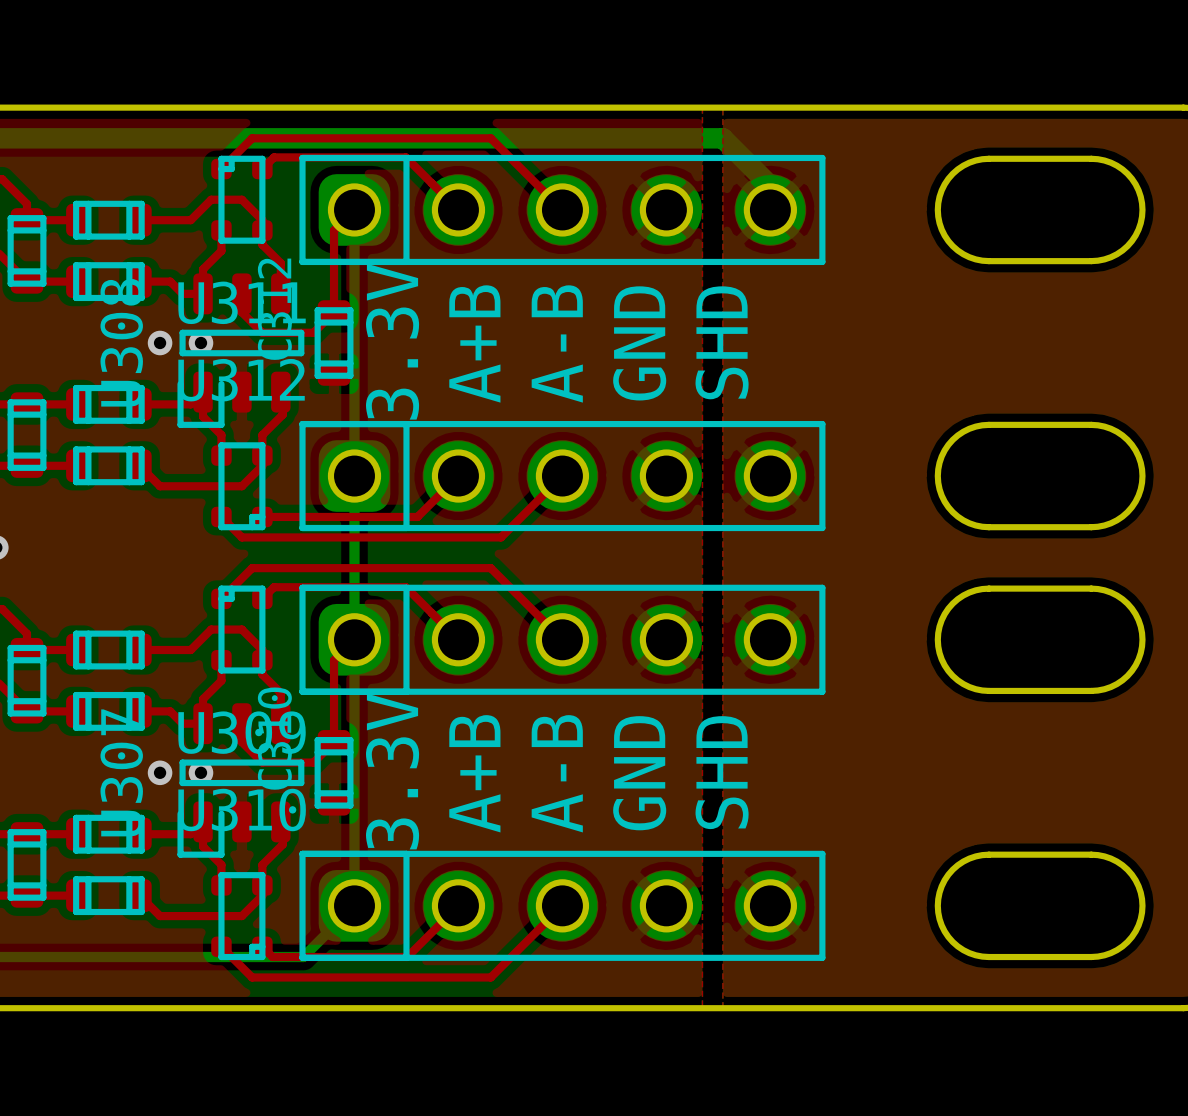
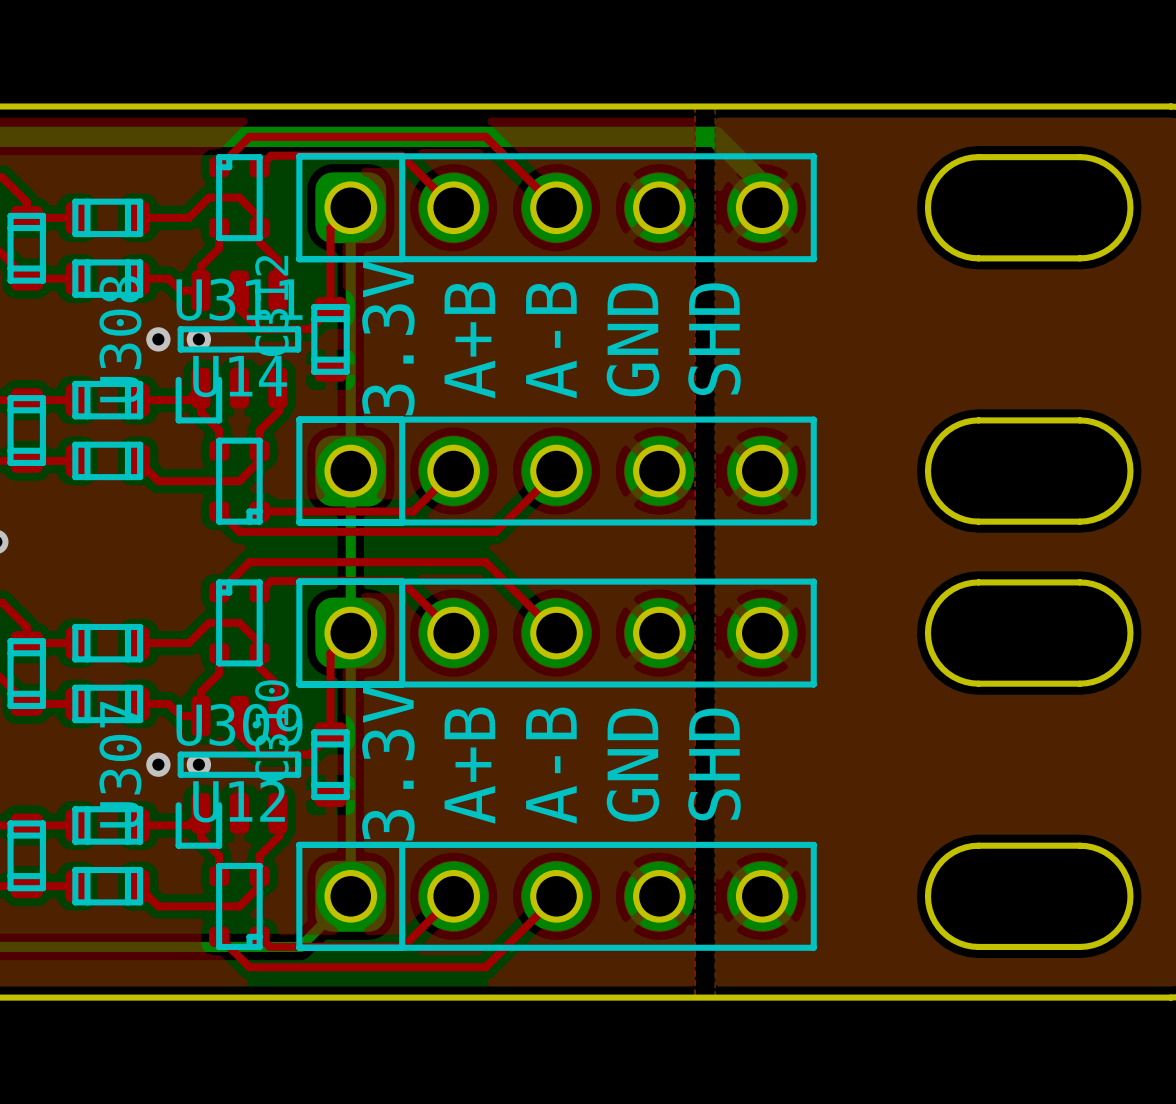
U312 name: U312 (241, 380) -> U14 (240, 376)
U310 name: U310 (242, 810) -> U12 (239, 801)

